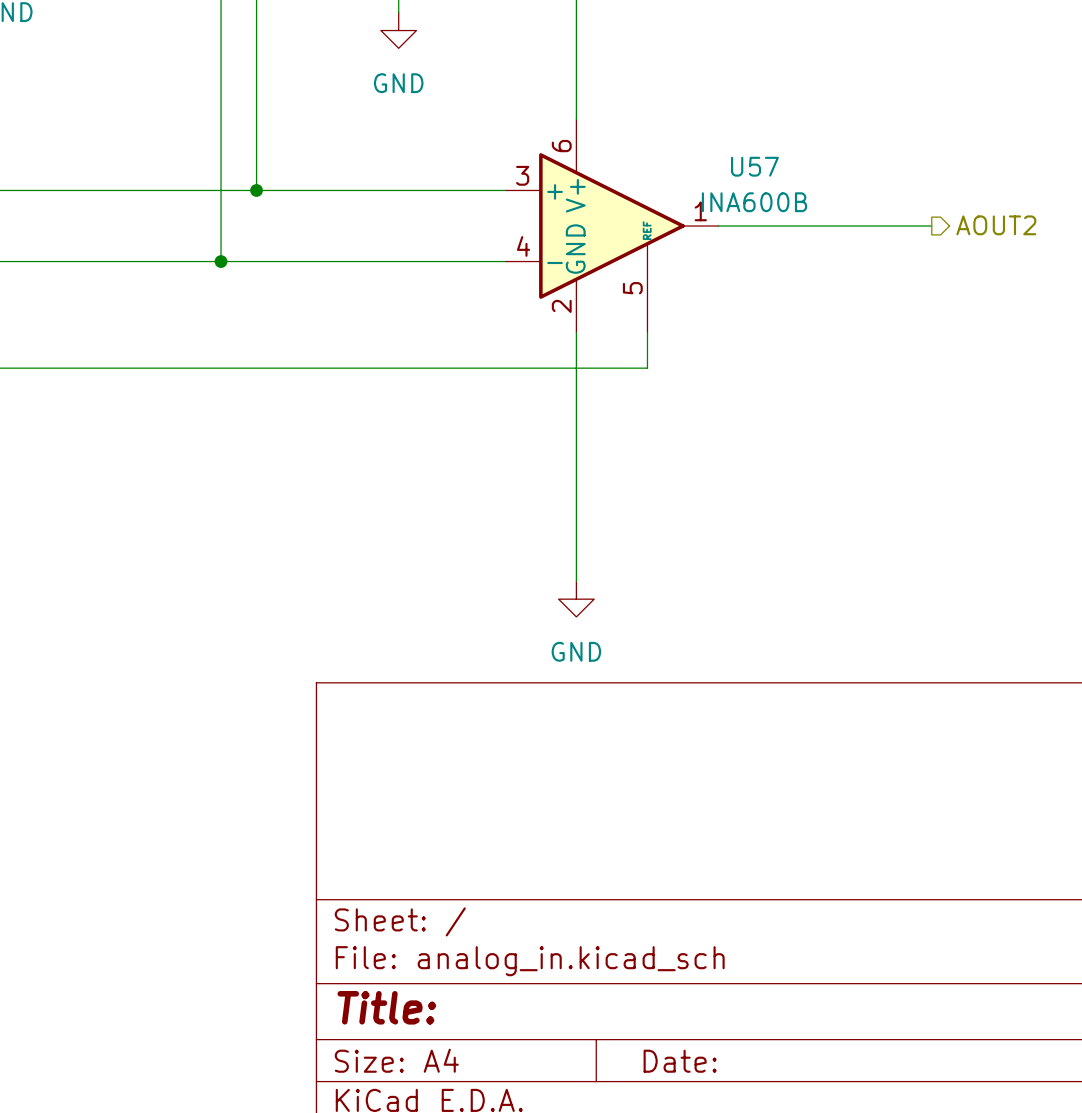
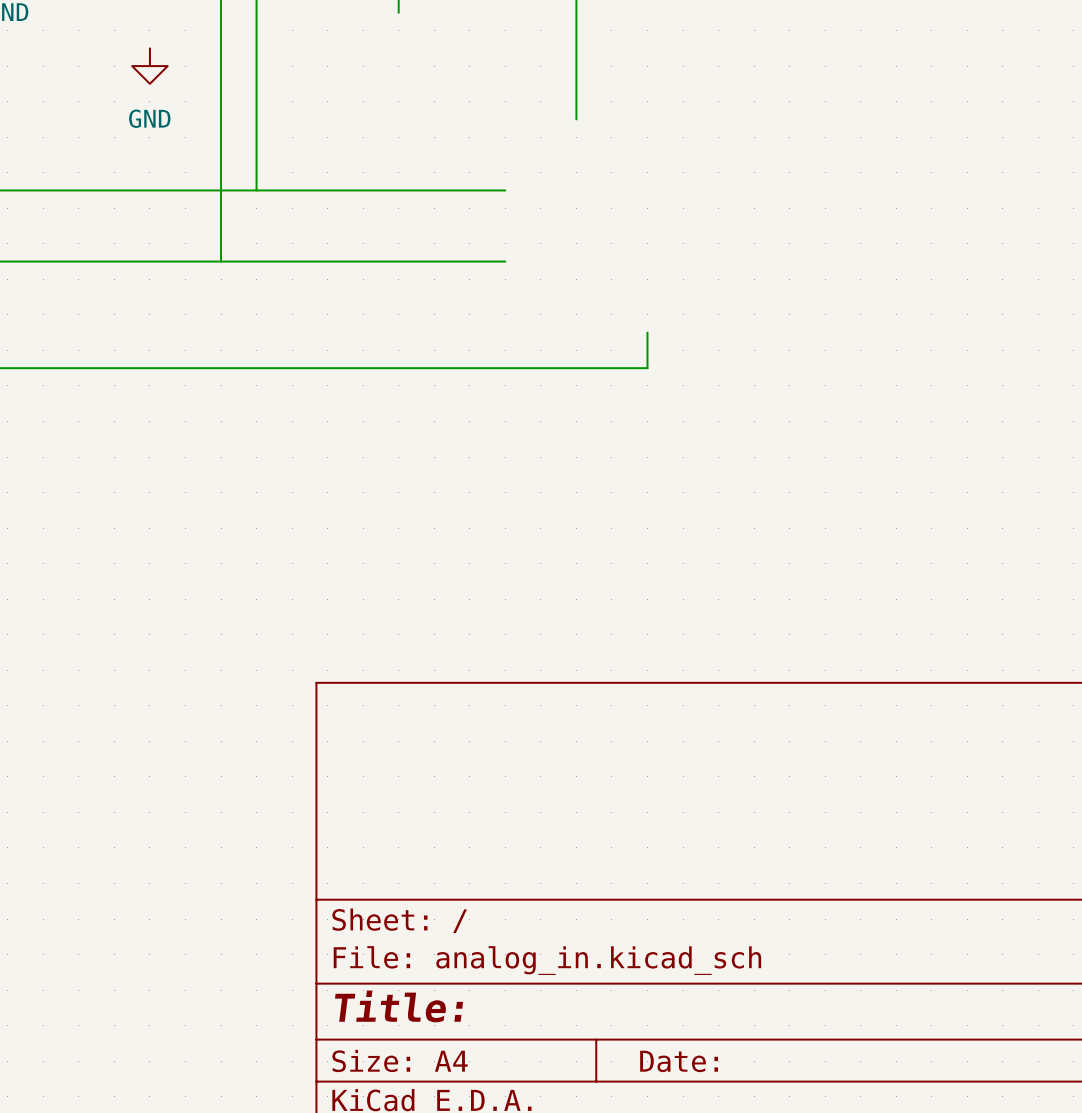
power symbol position: GND (398, 30) -> GND (149, 66)
junction: (256, 190) -> none
hierarchical label: AOUT2 (996, 225) -> none
U57: INA600B (611, 226) -> none
wire: (718, 226) (931, 226) -> none
junction: (221, 261) -> none
wire: (576, 332) (576, 581) -> none
power symbol: GND (576, 599) -> none

